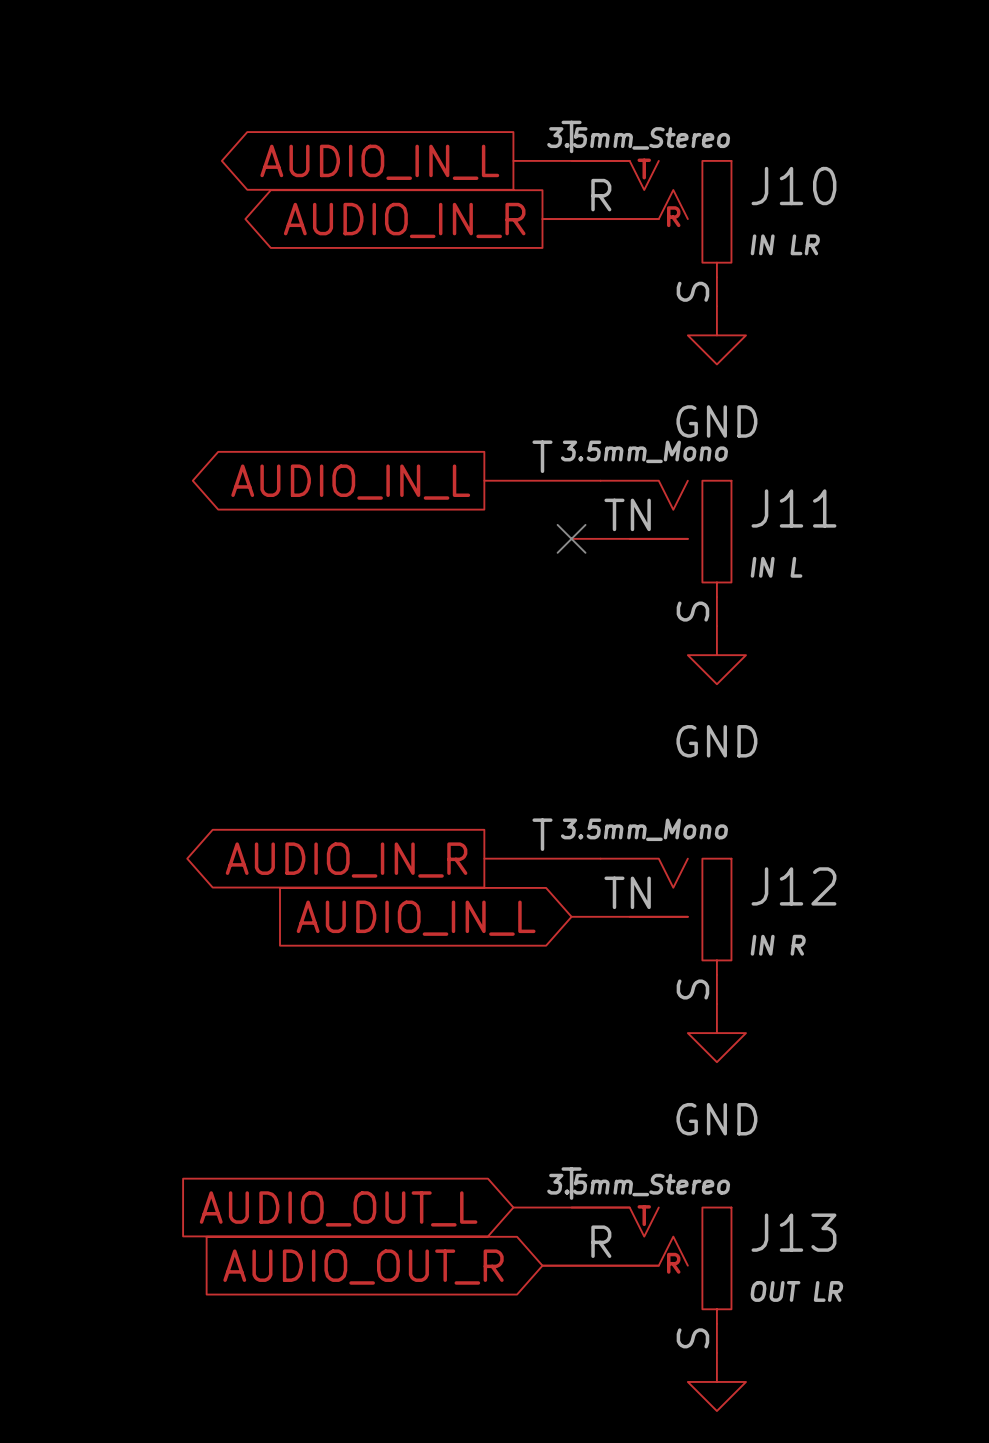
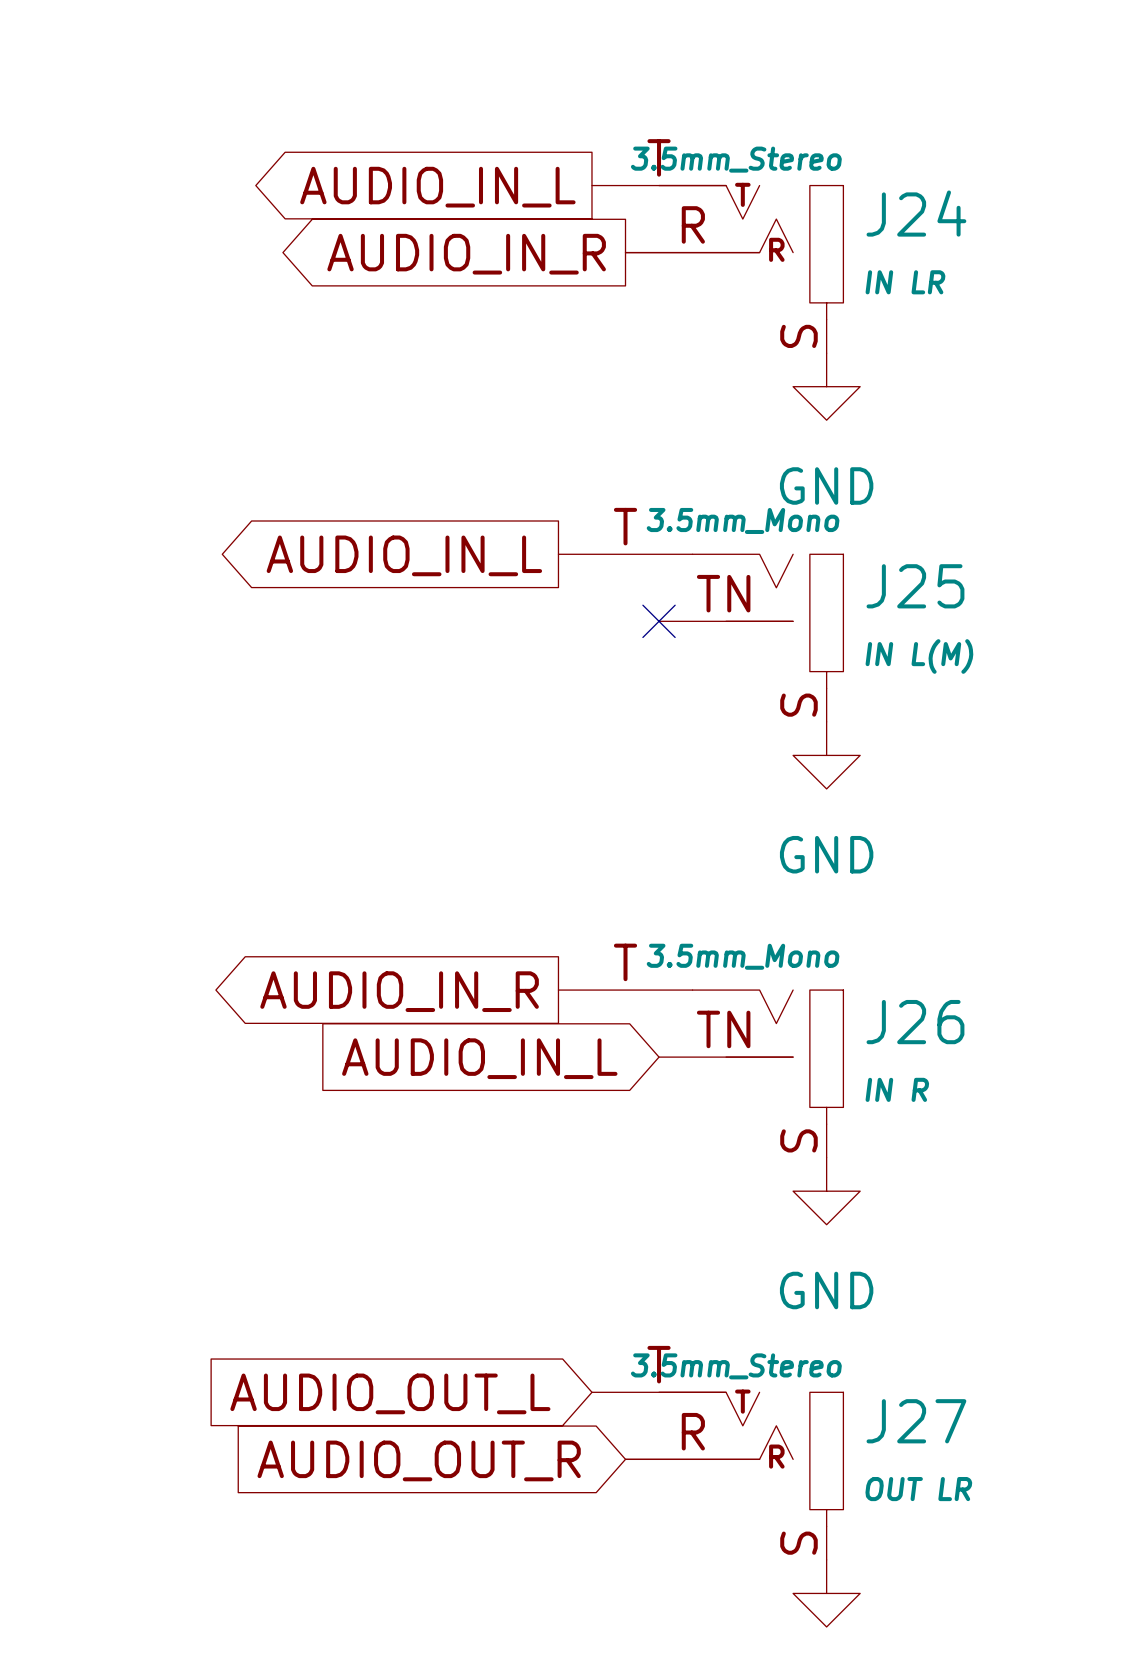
J10 name: J10 (793, 186) -> J24 (916, 213)
J11 name: J11 (793, 508) -> J25 (915, 586)
J11 text: IN L (776, 567) -> IN L(M) (919, 656)
J12 name: J12 (793, 886) -> J26 (915, 1022)
J13 name: J13 (793, 1232) -> J27 (916, 1421)

